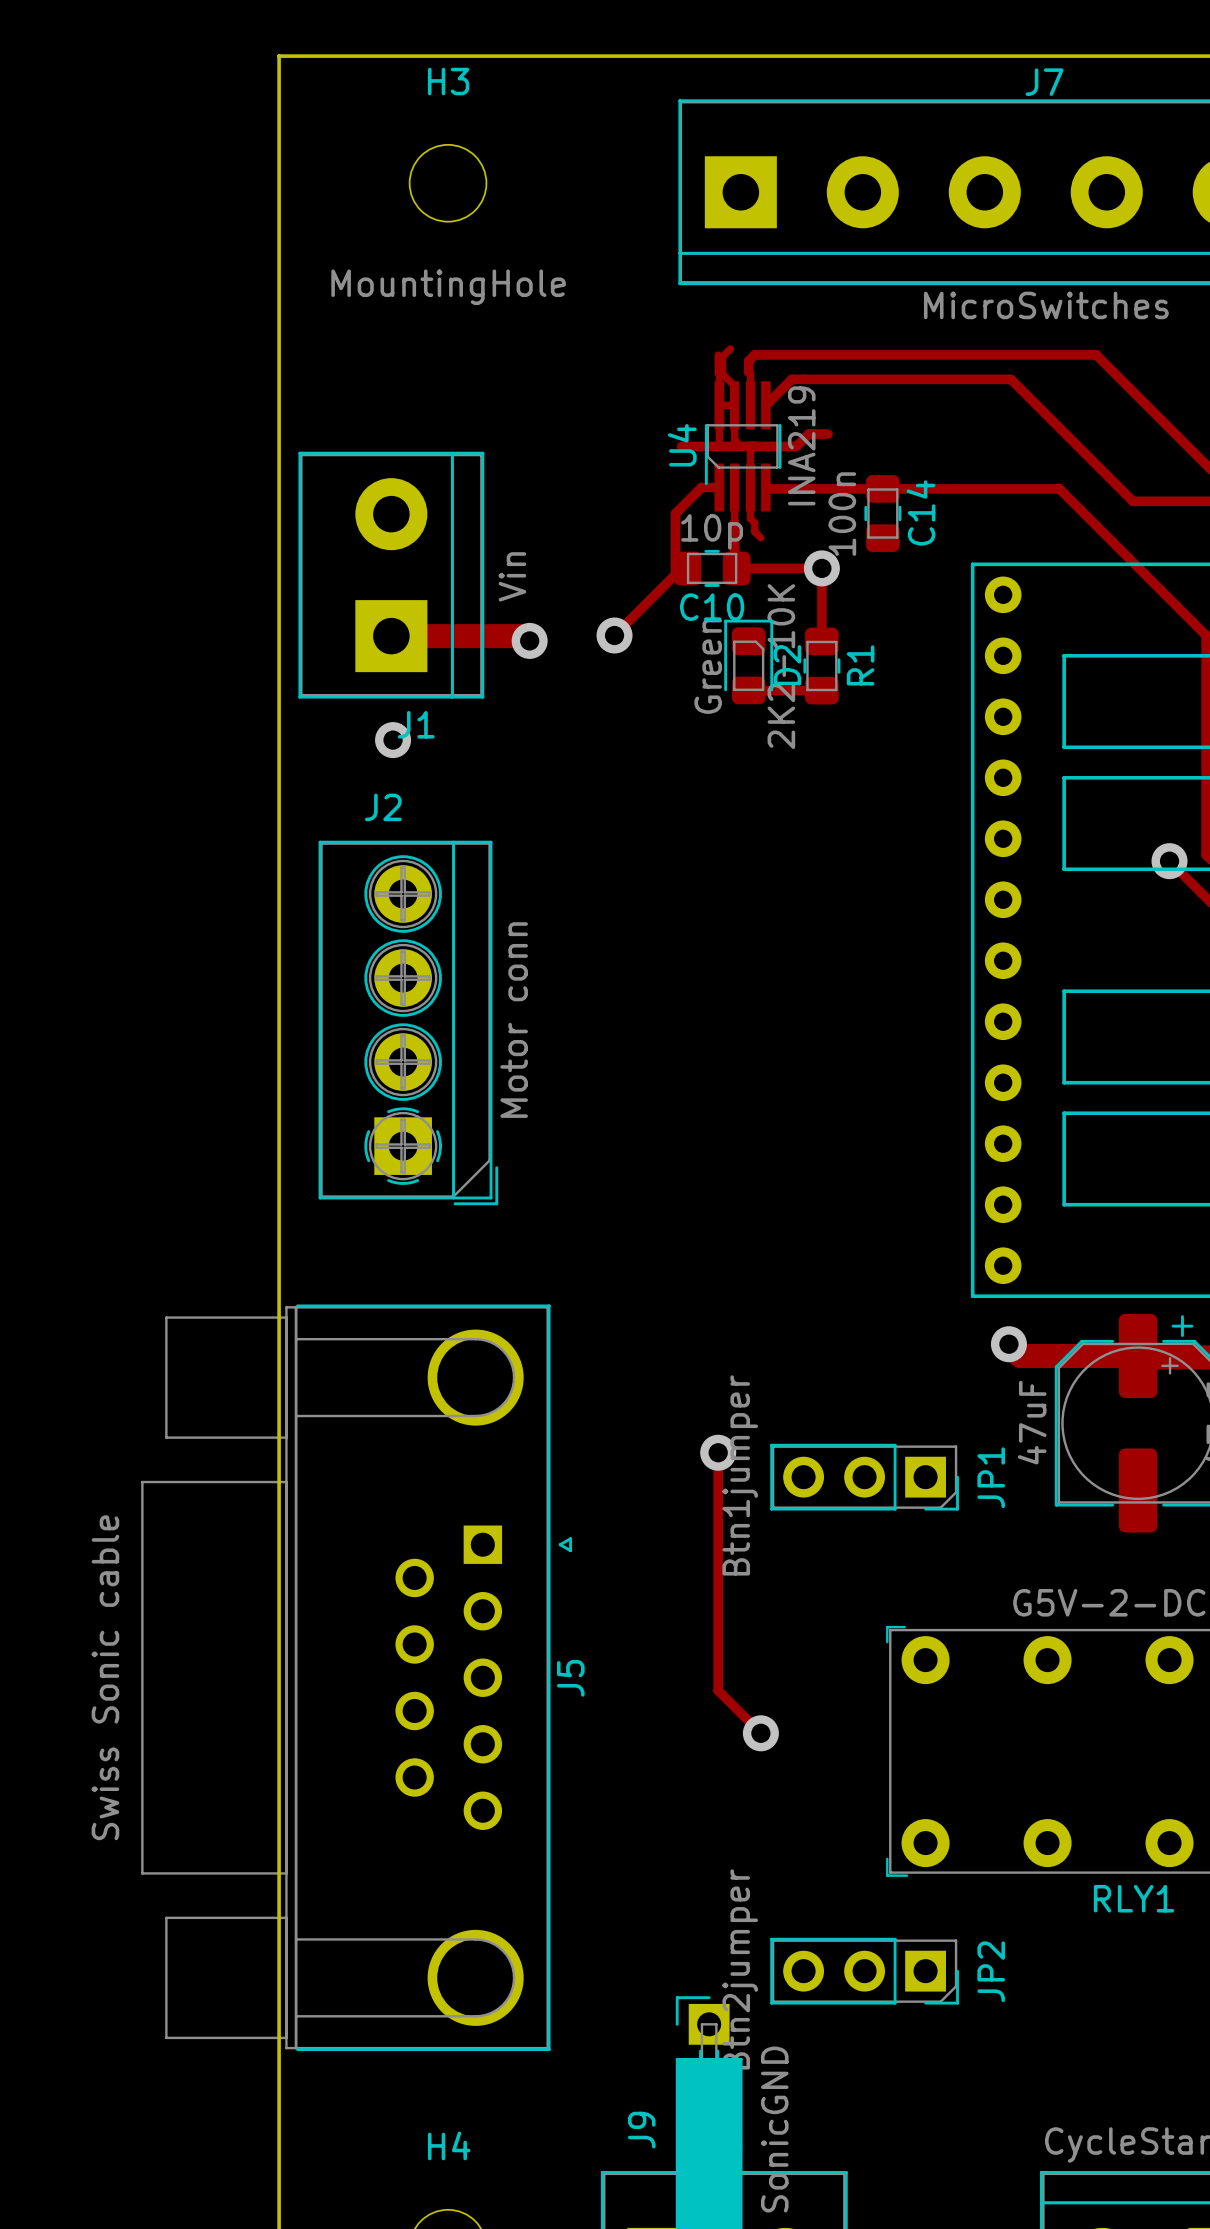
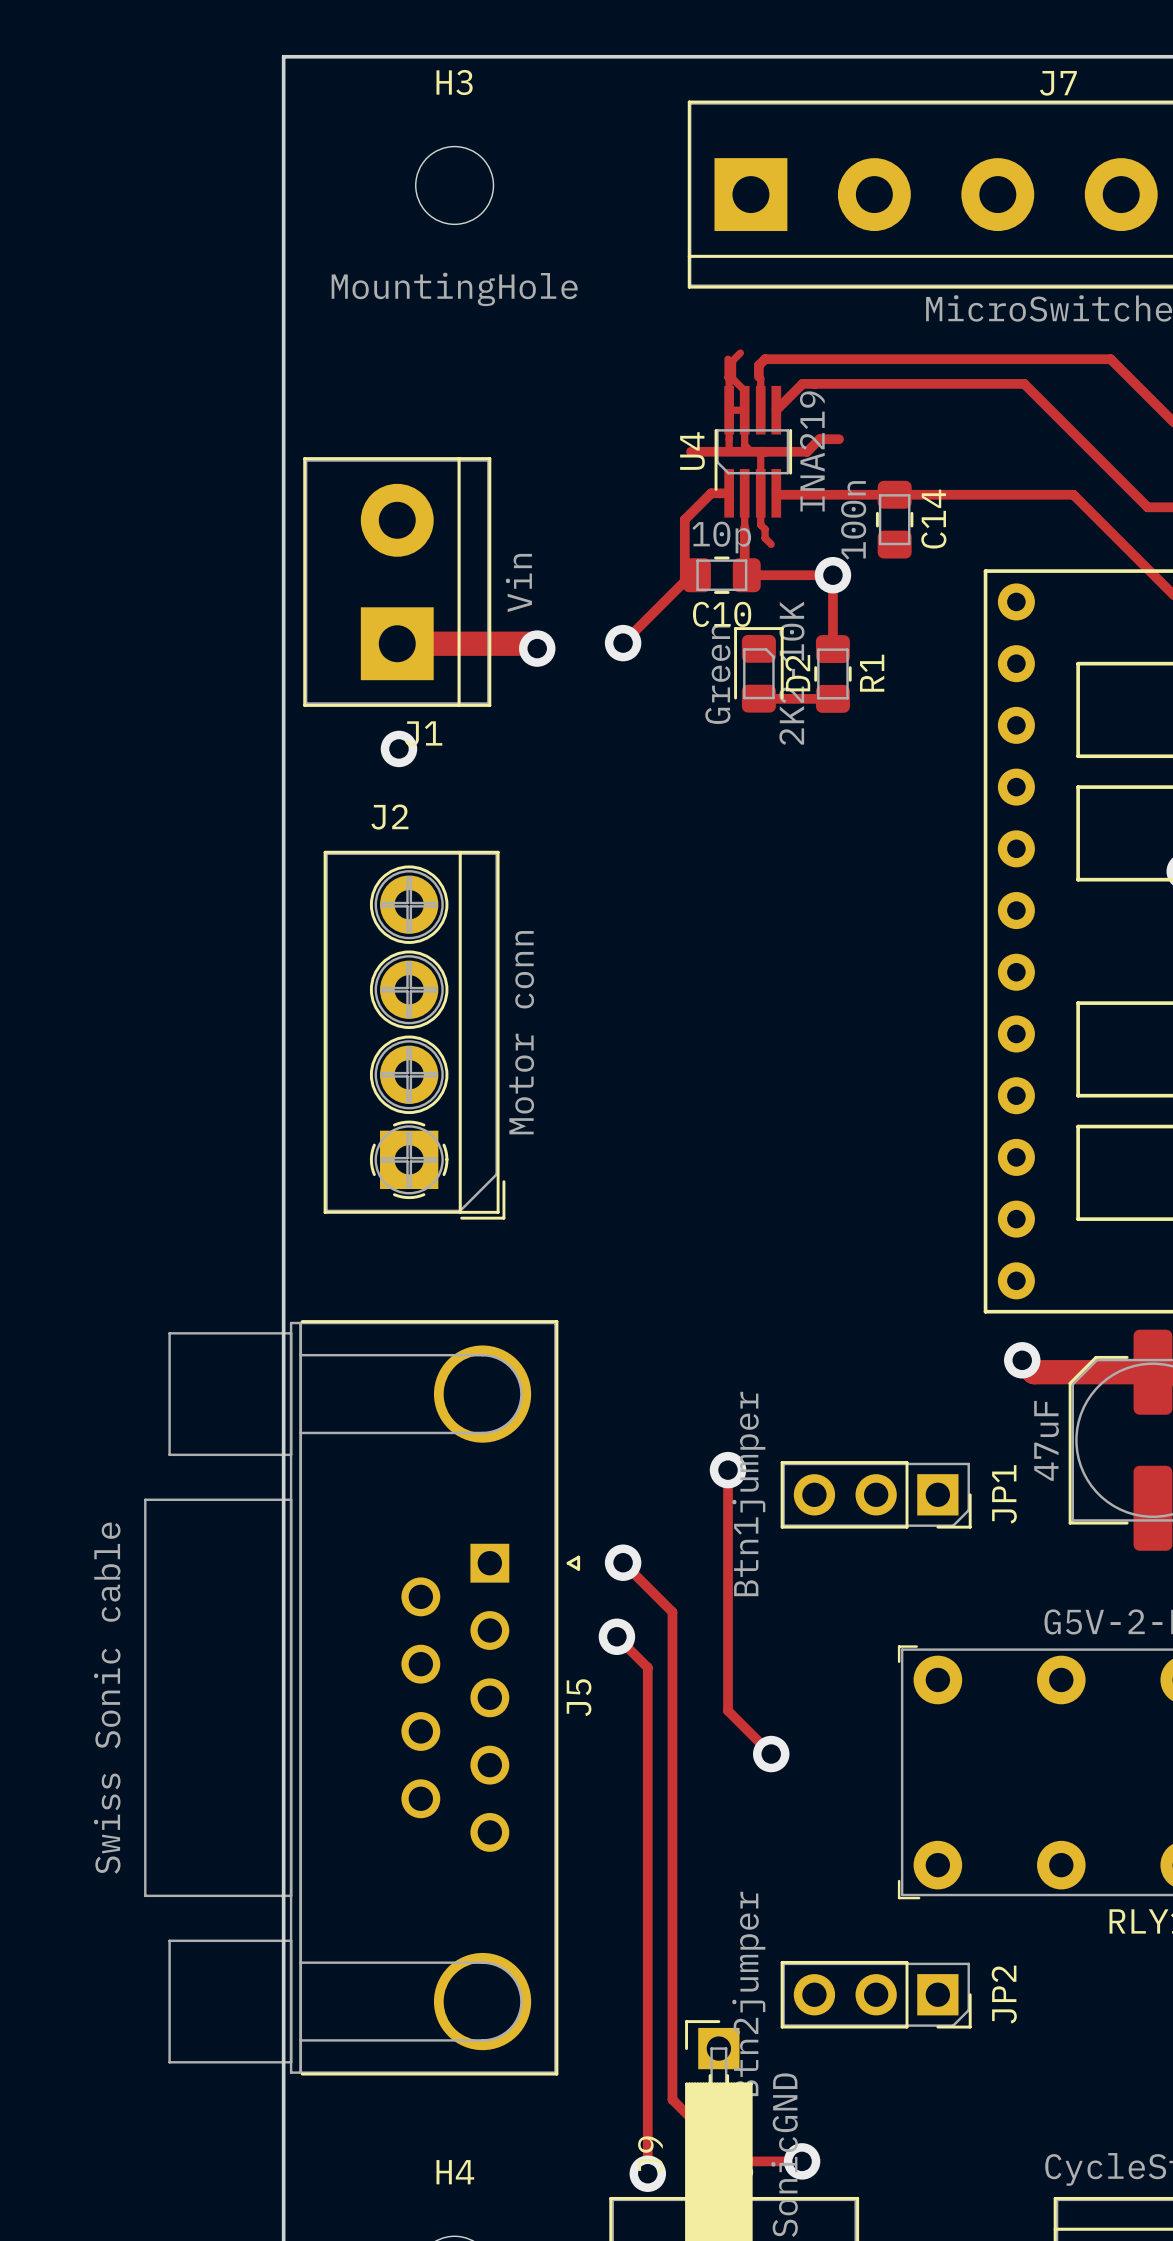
track: none -> (623, 1562) (672, 1612) (672, 2099) (734, 2161) (802, 2161)
via: none -> (623, 1562)
track: none -> (616, 1636) (647, 1667) (647, 2173)
via: none -> (616, 1636)
via: none -> (802, 2161)
via: none -> (647, 2173)

